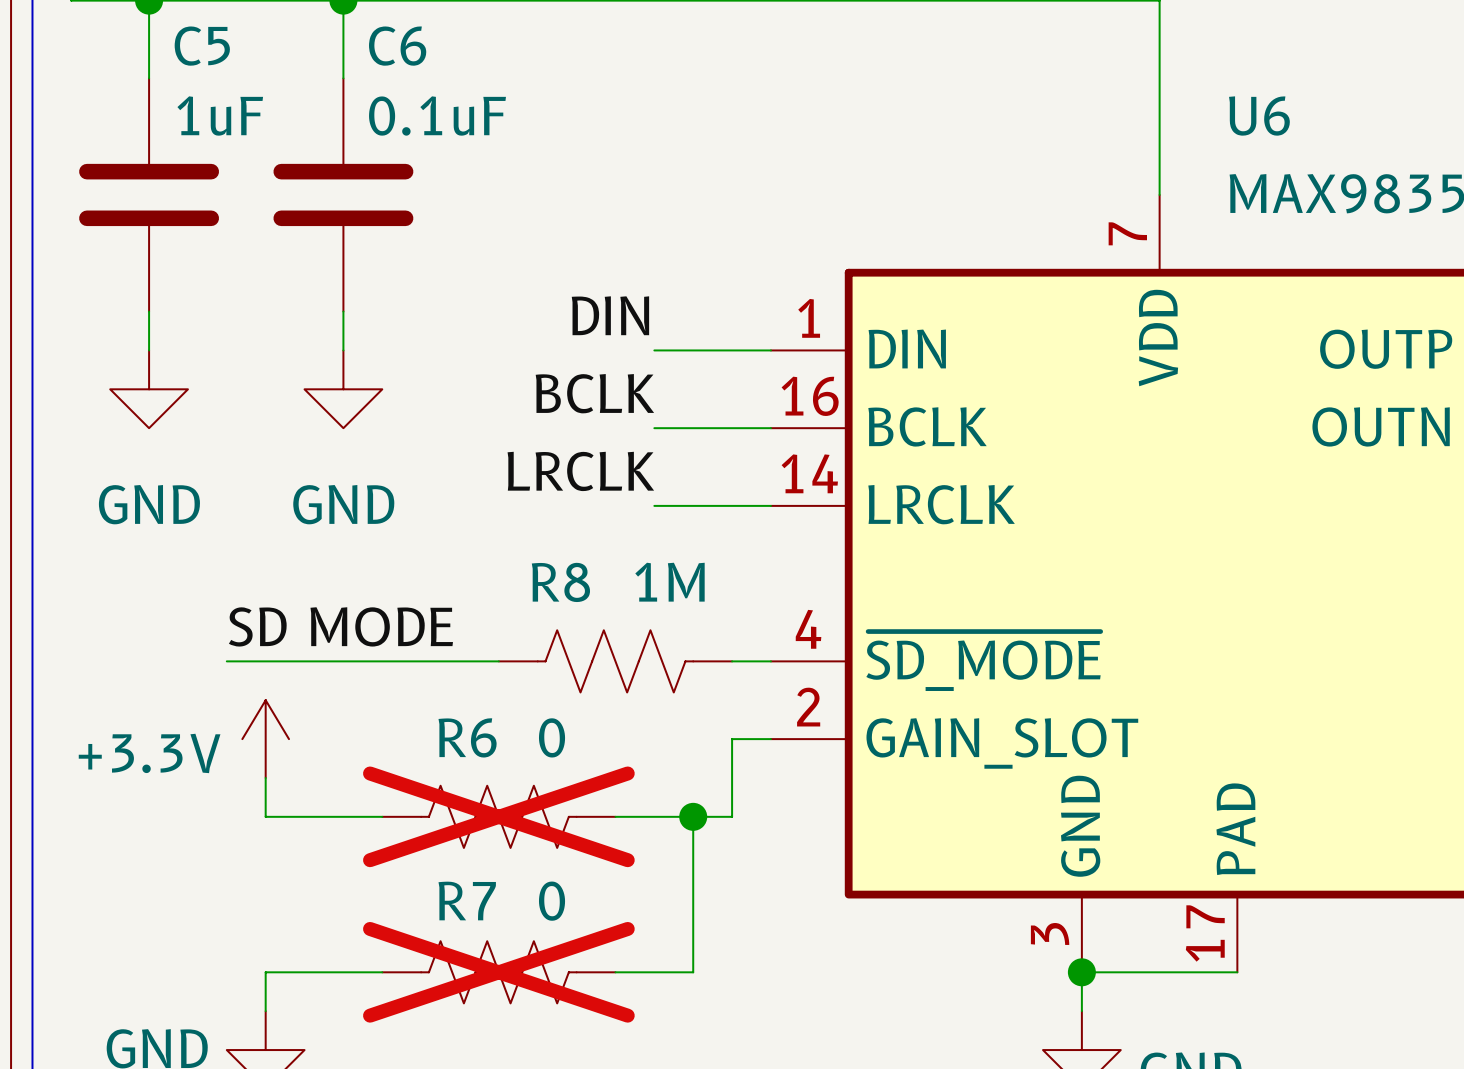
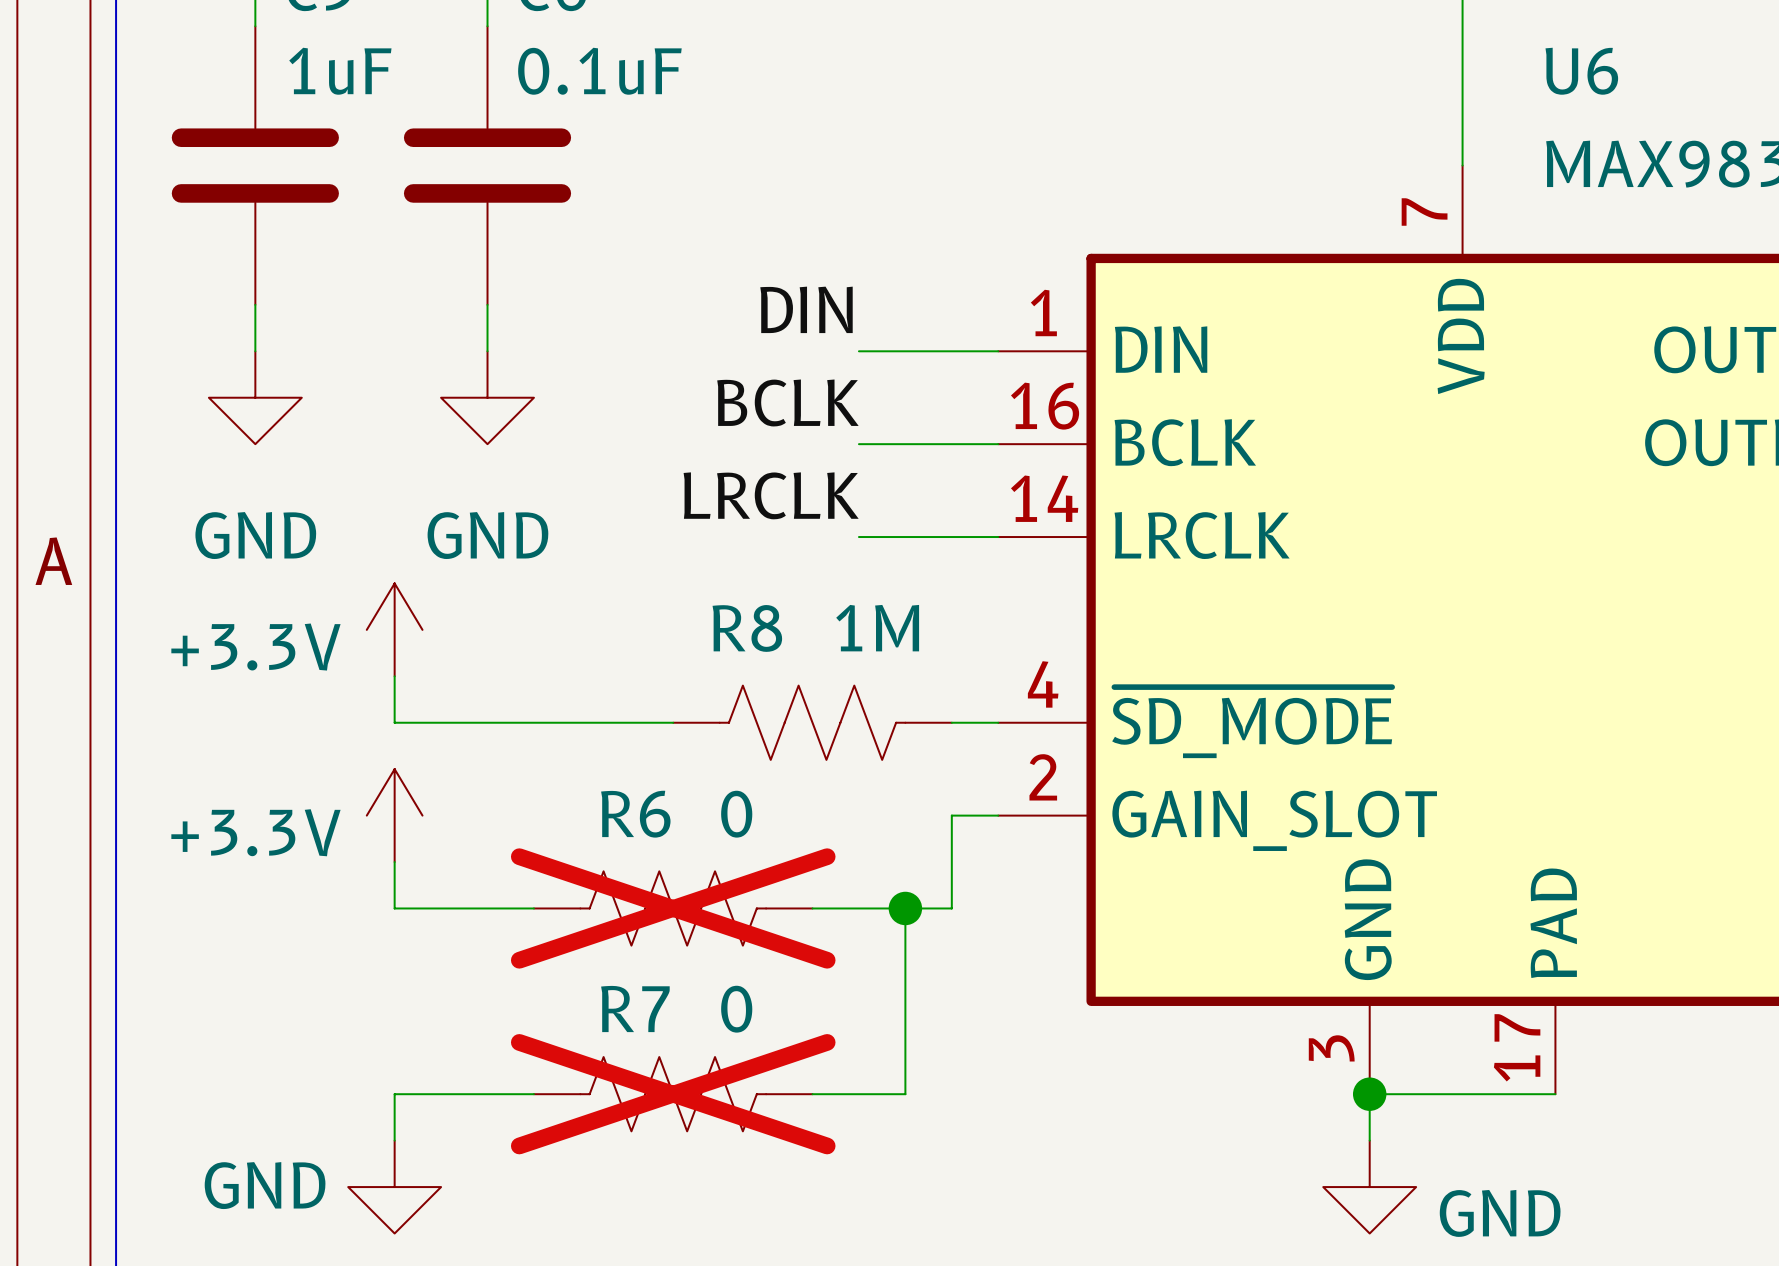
power symbol: none -> +3.3V (394, 629)
label: SD MODE (340, 626) -> none
wire: (226, 661) (265, 661) -> (394, 676) (394, 722)

